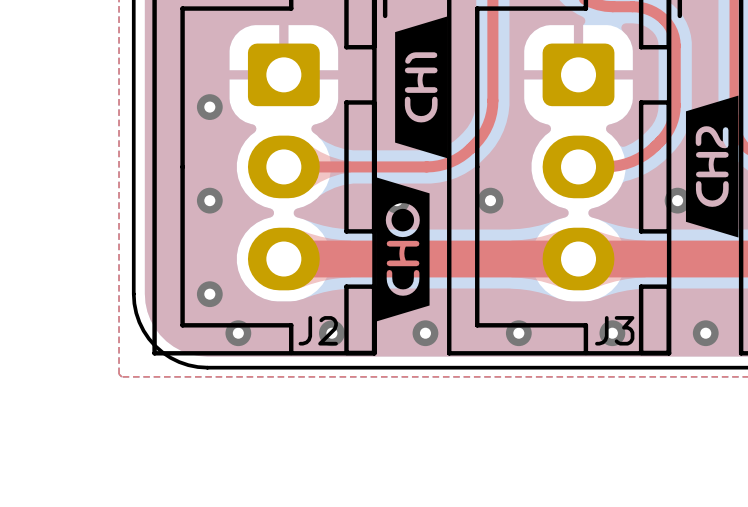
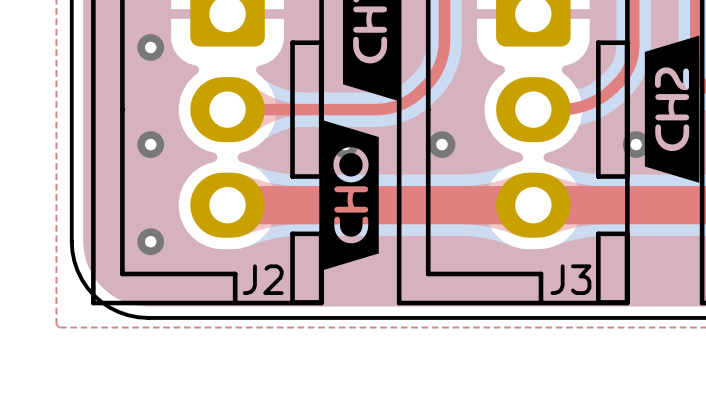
via: (238, 333) -> none
via: (331, 333) -> none
via: (425, 333) -> none
via: (518, 333) -> none
via: (612, 333) -> none
via: (705, 333) -> none

